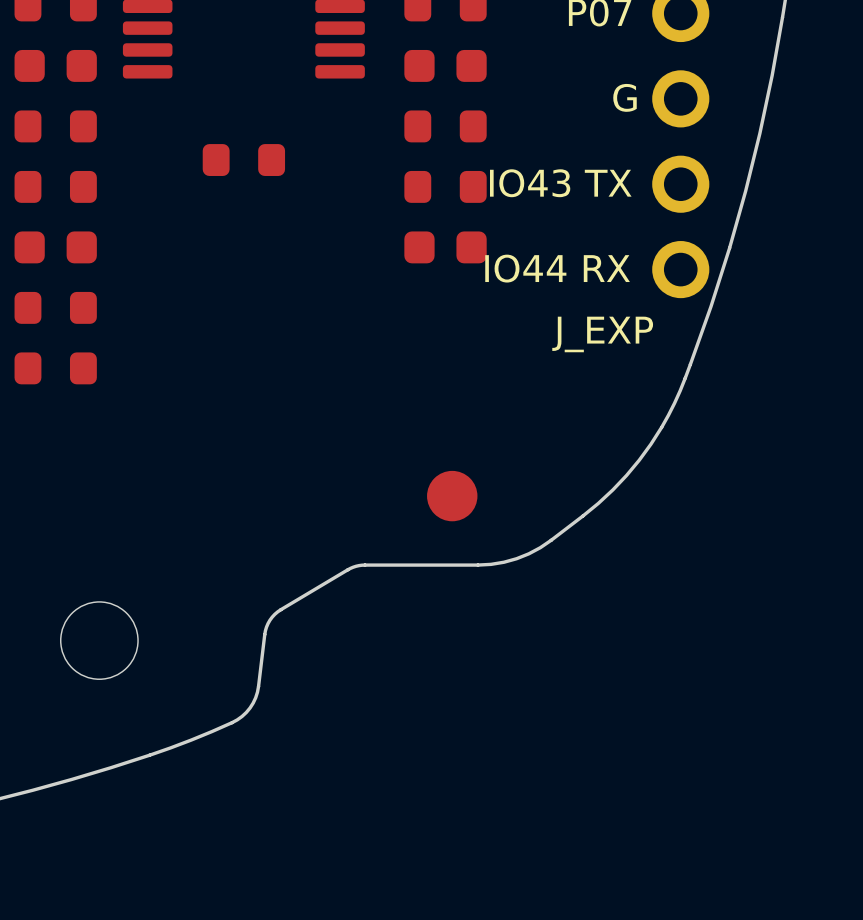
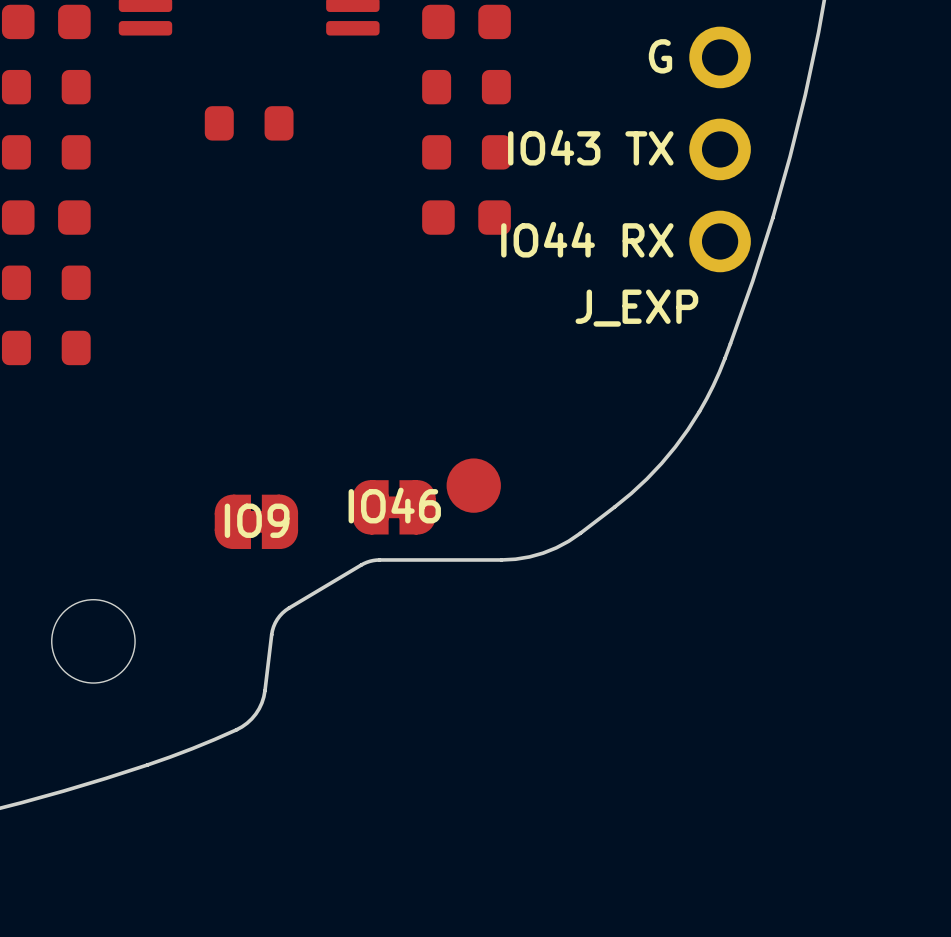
text: none -> IO46 (394, 505)
part: none -> (394, 507)
text: none -> IO9 (257, 520)
part: none -> (256, 521)

